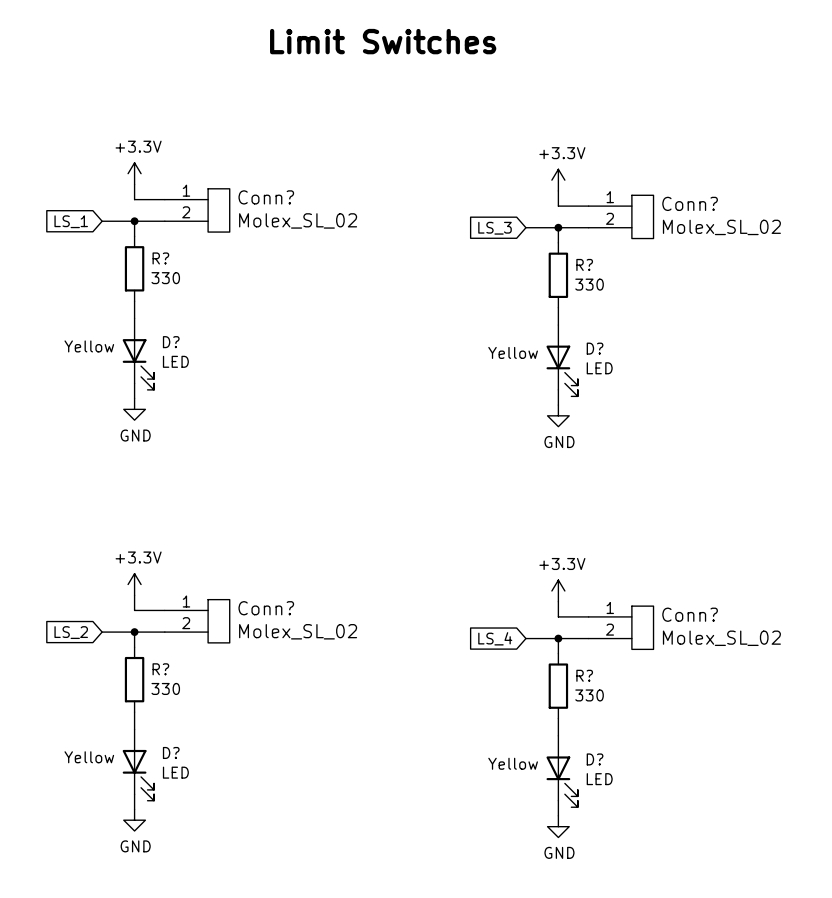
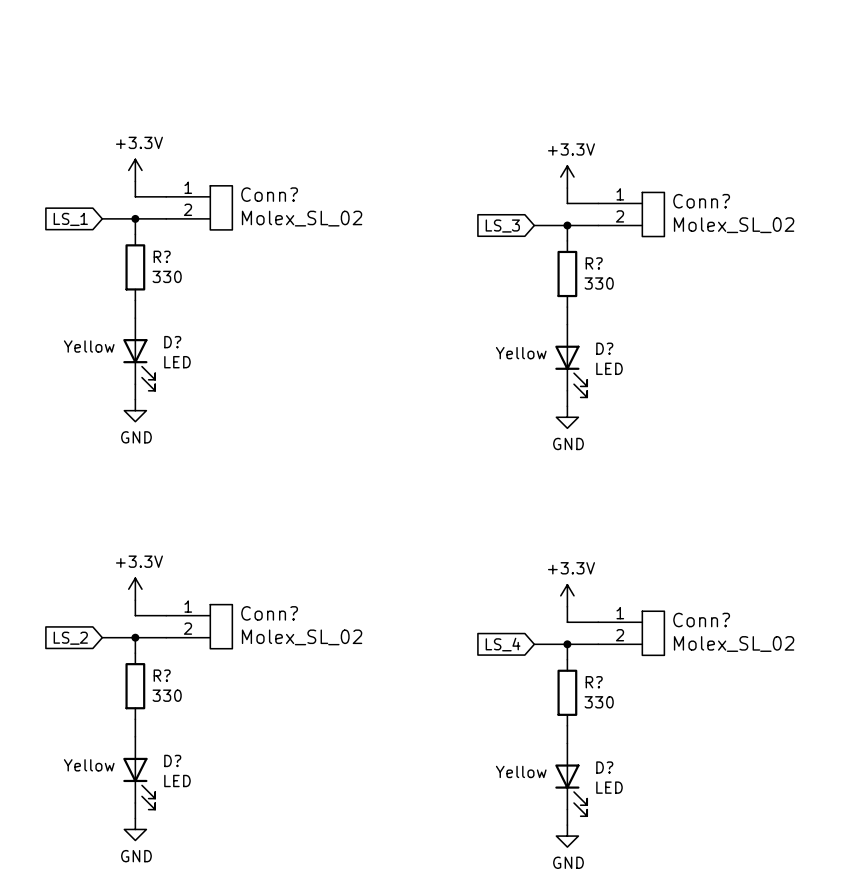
text: Limit Switches (383, 41) -> none

